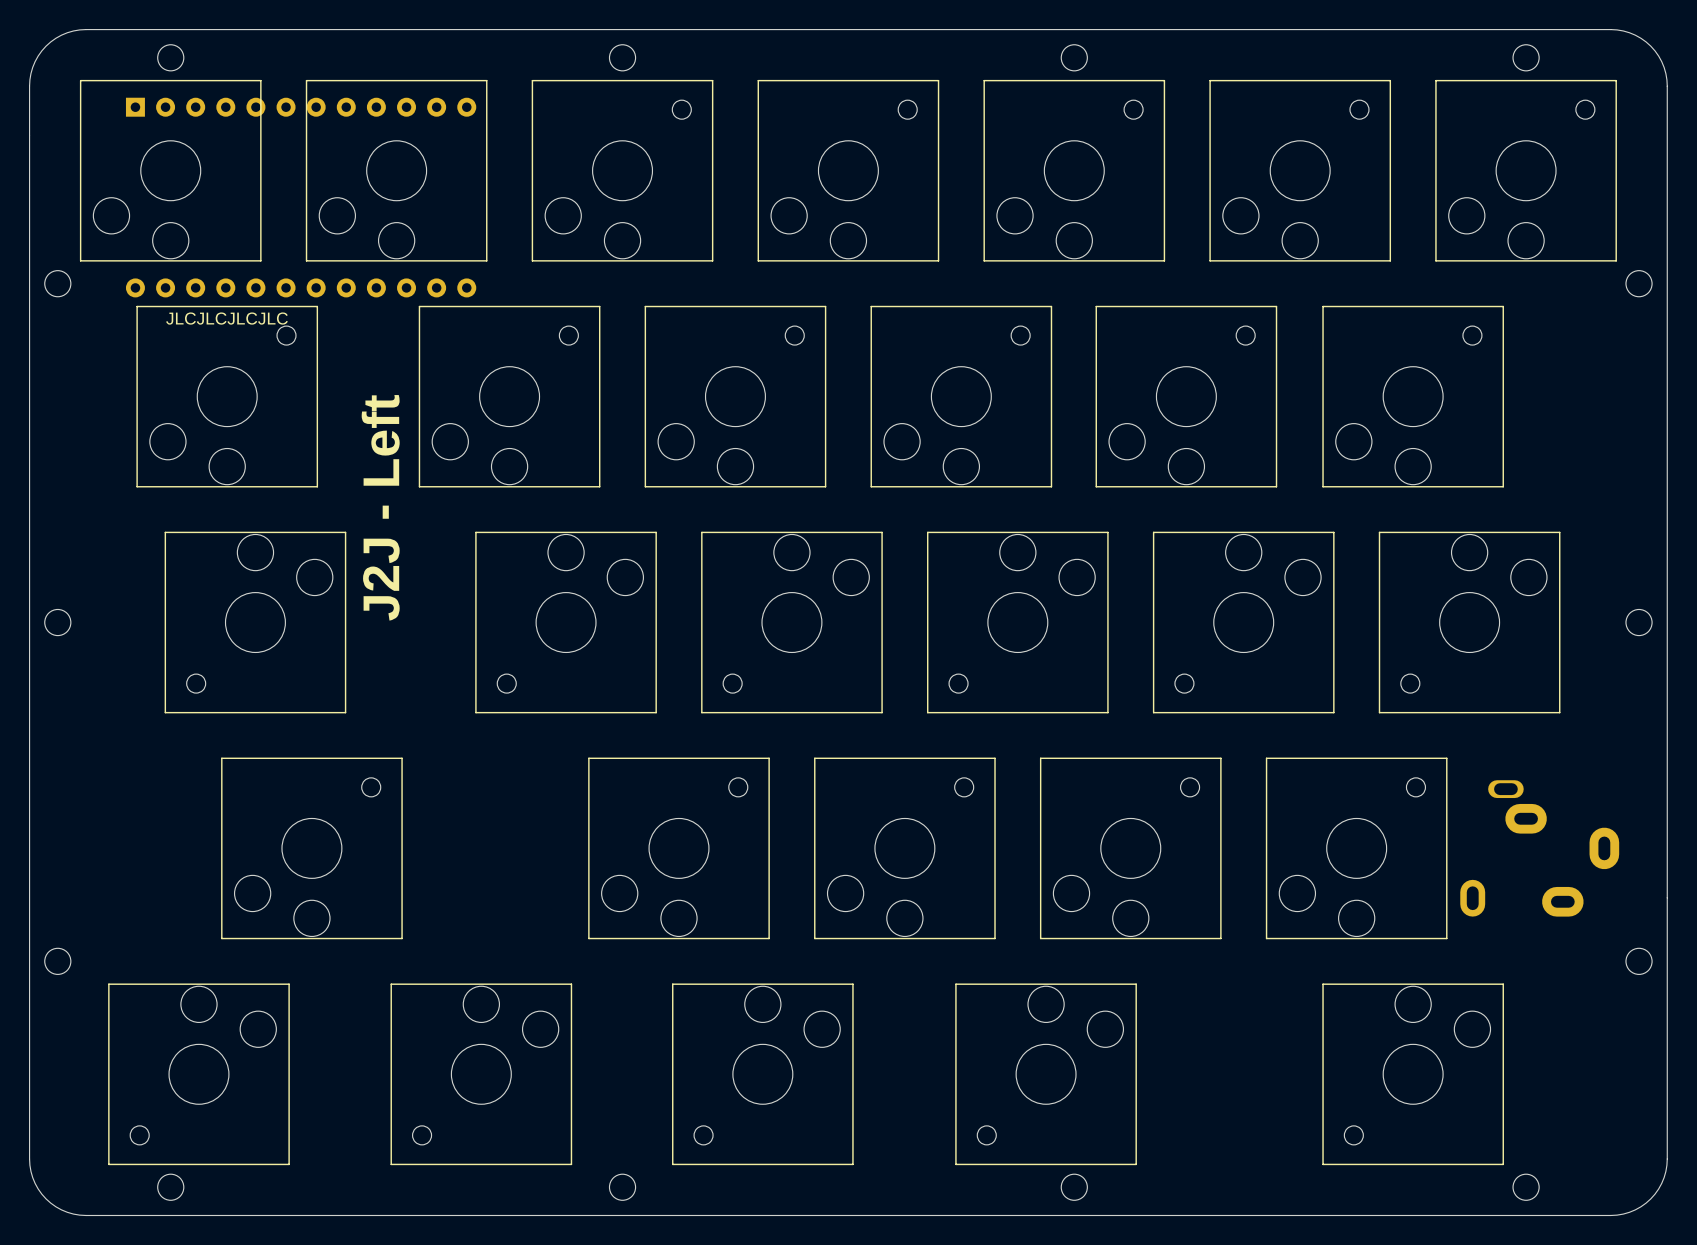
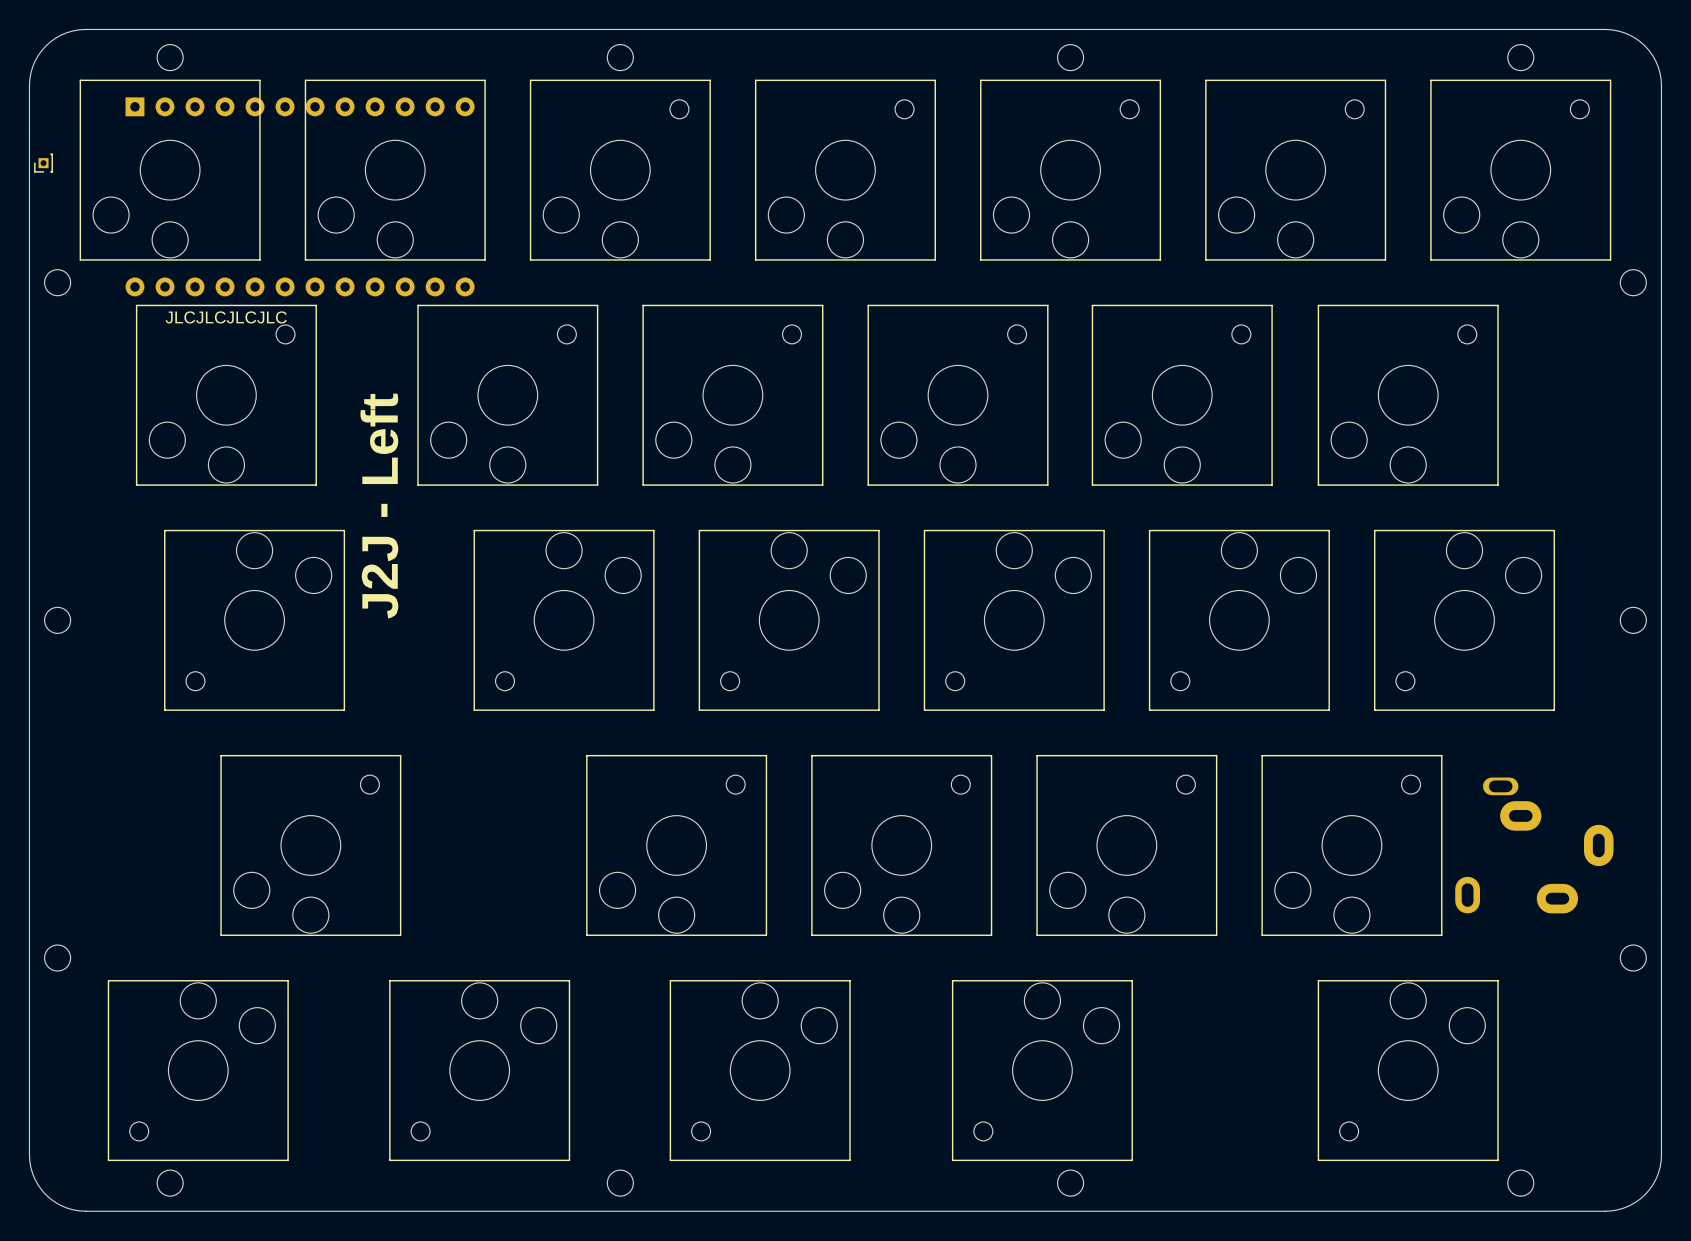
part: none -> (43, 163)

